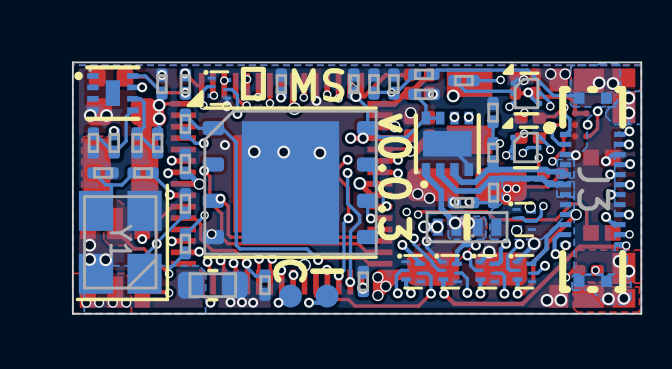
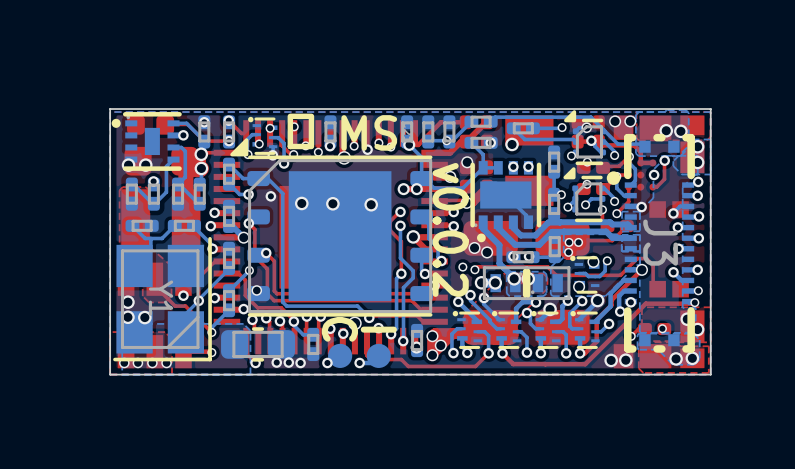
text: v0.0.3 (395, 176) -> v0.0.2 (450, 229)

